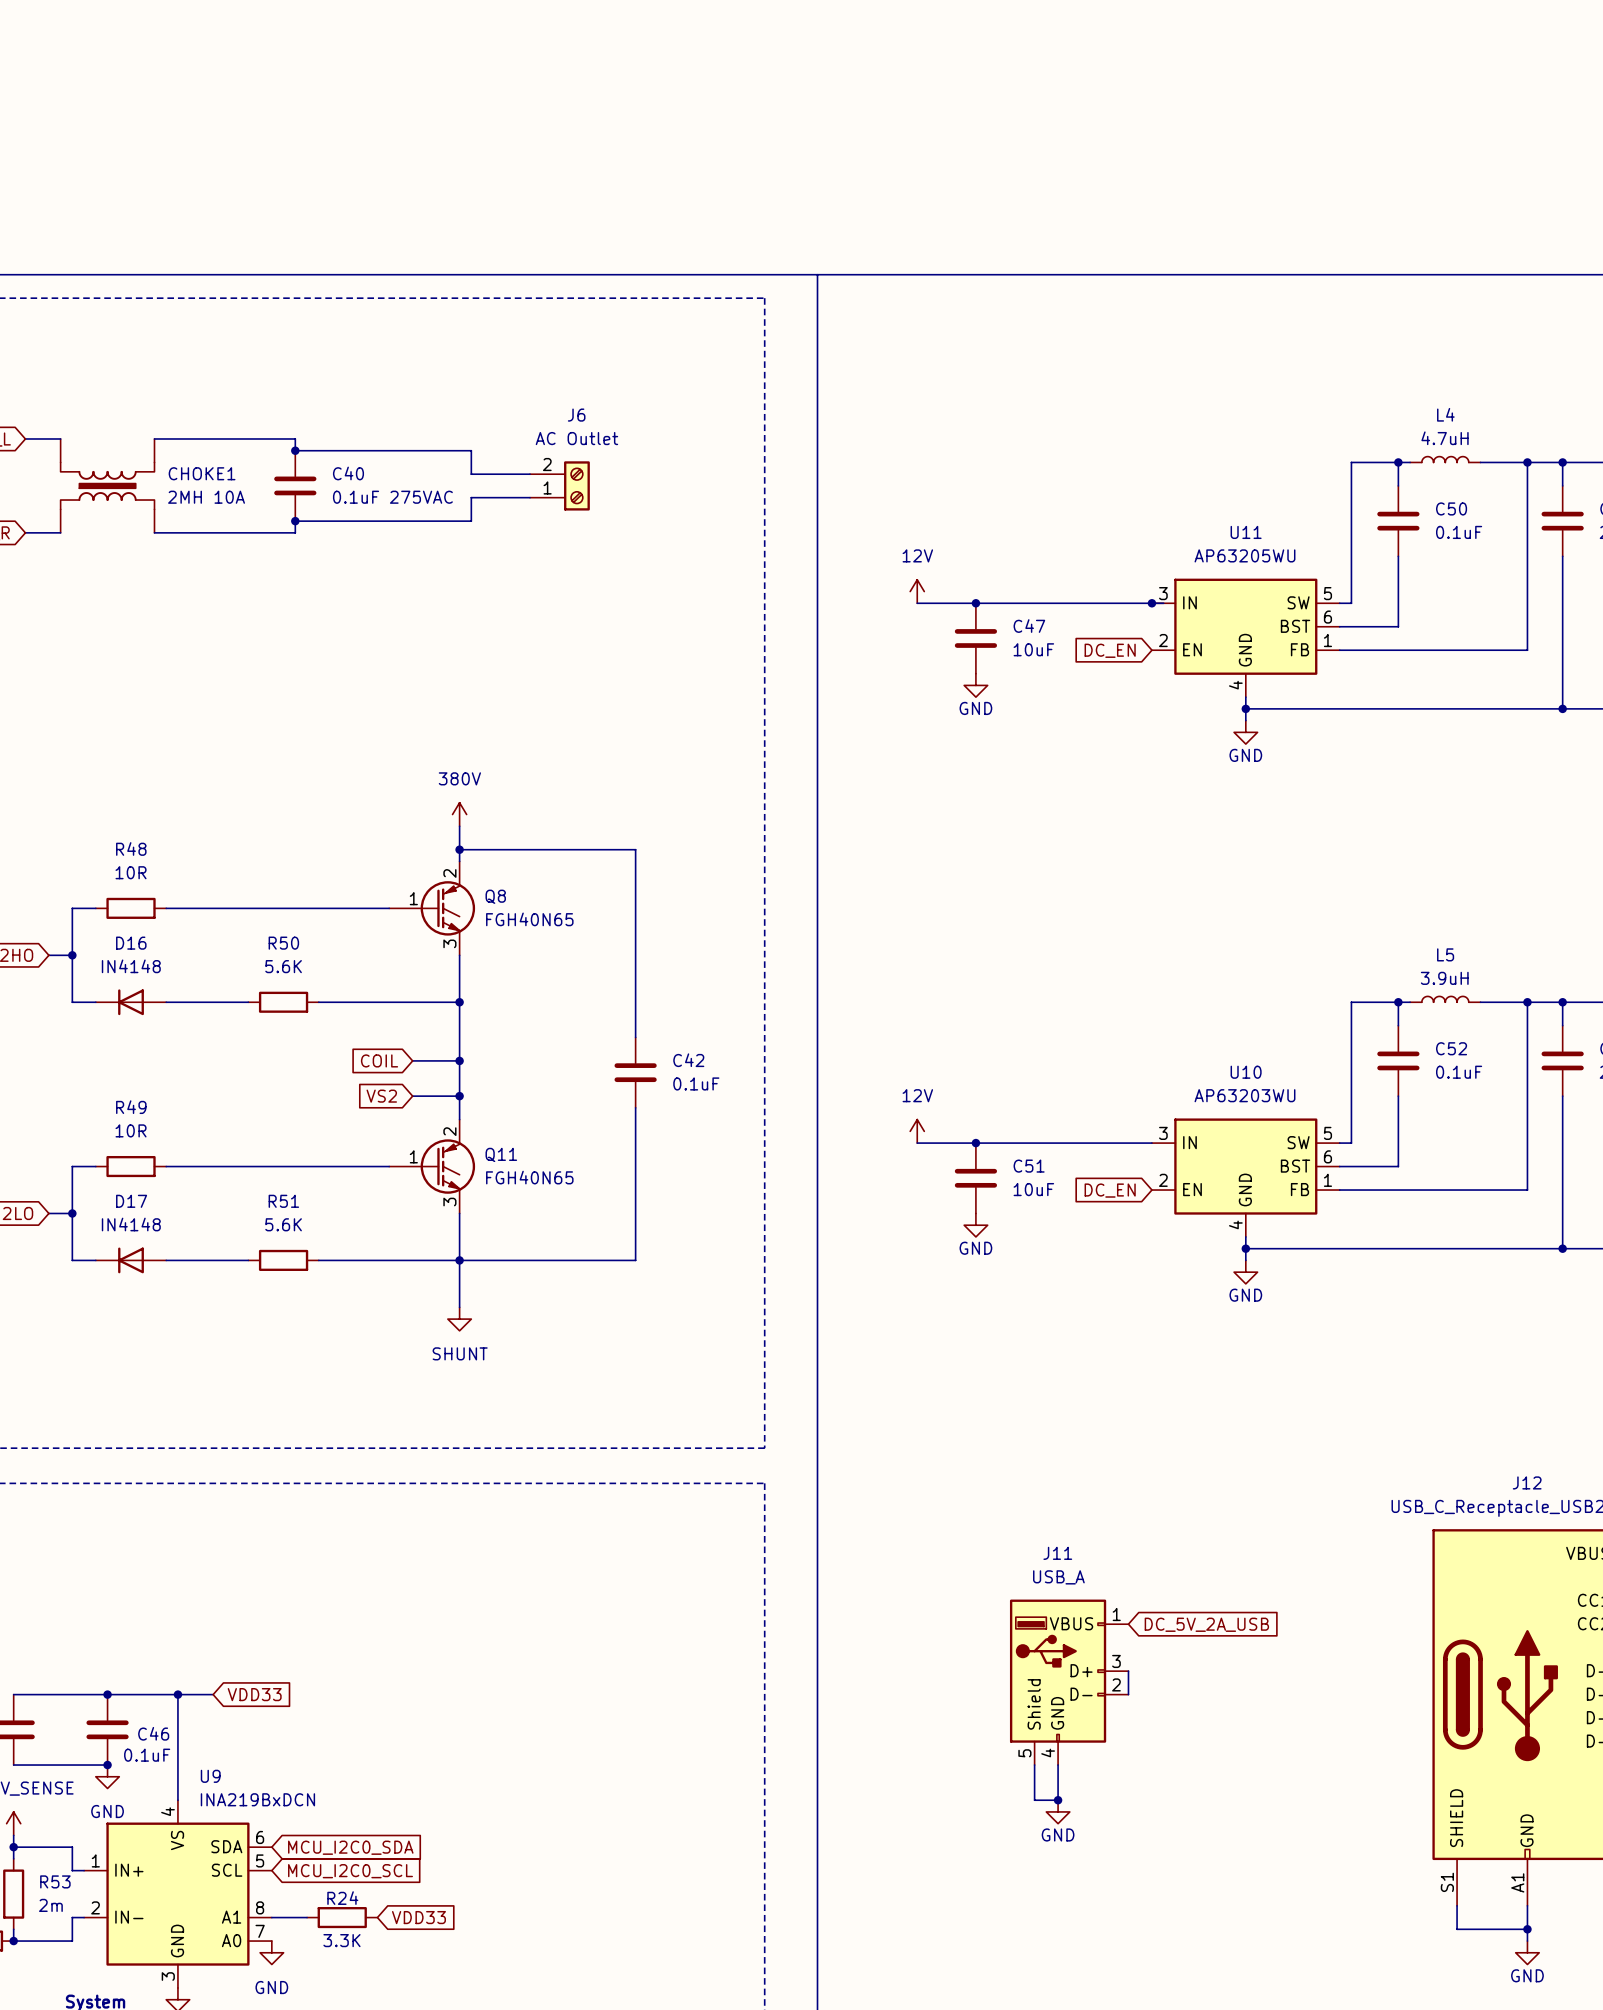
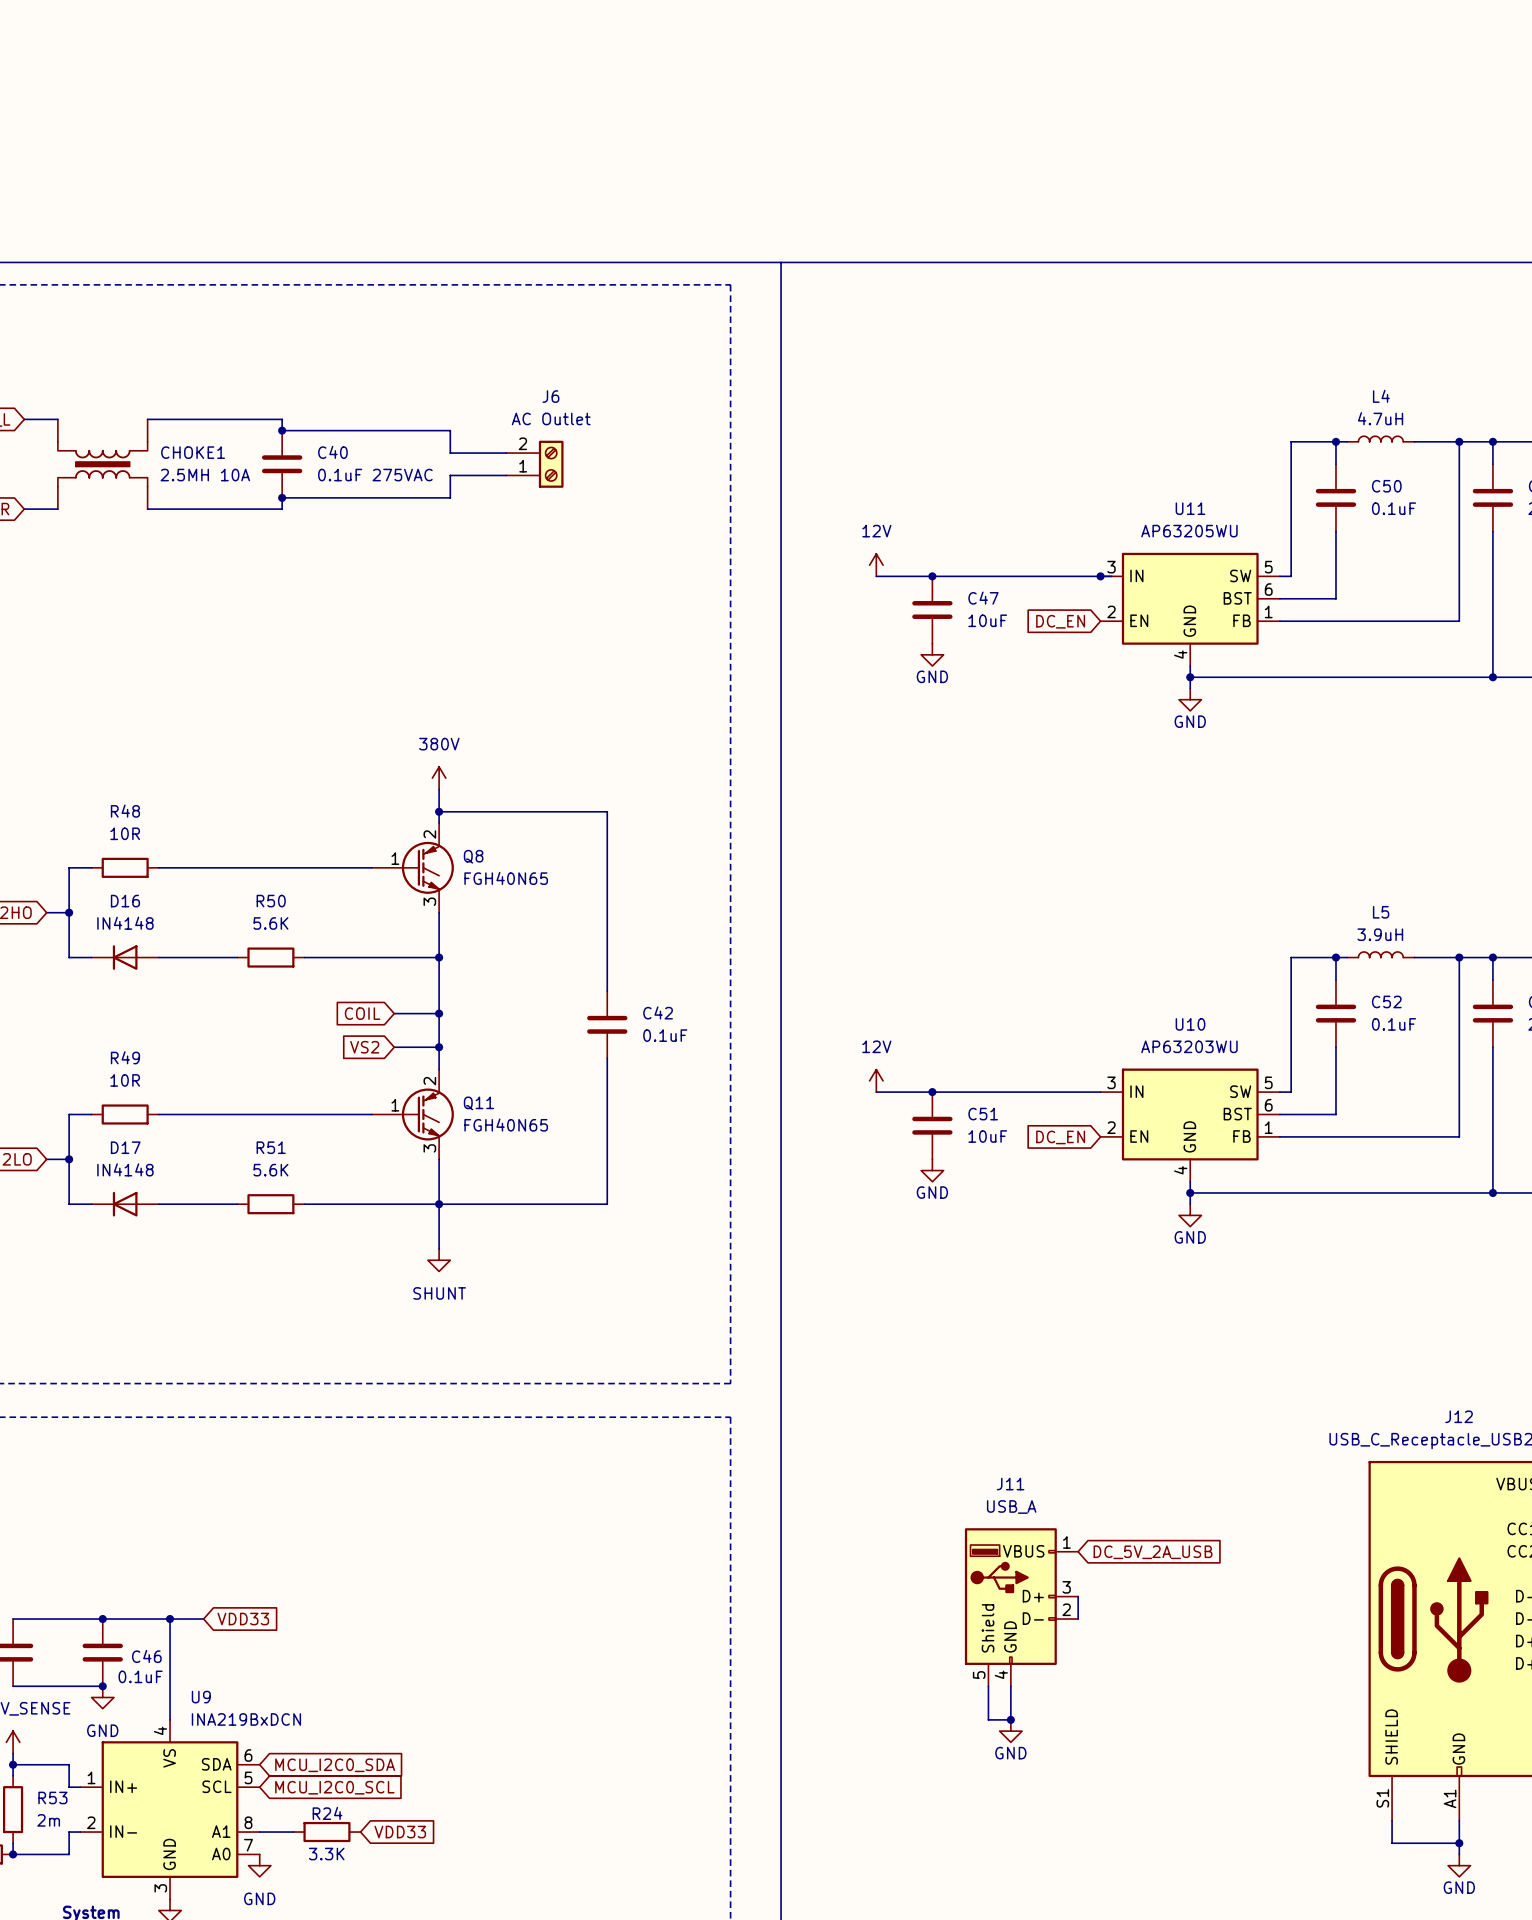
CHOKE1 value: 2MH 10A (206, 497) -> 2.5MH 10A (205, 475)

